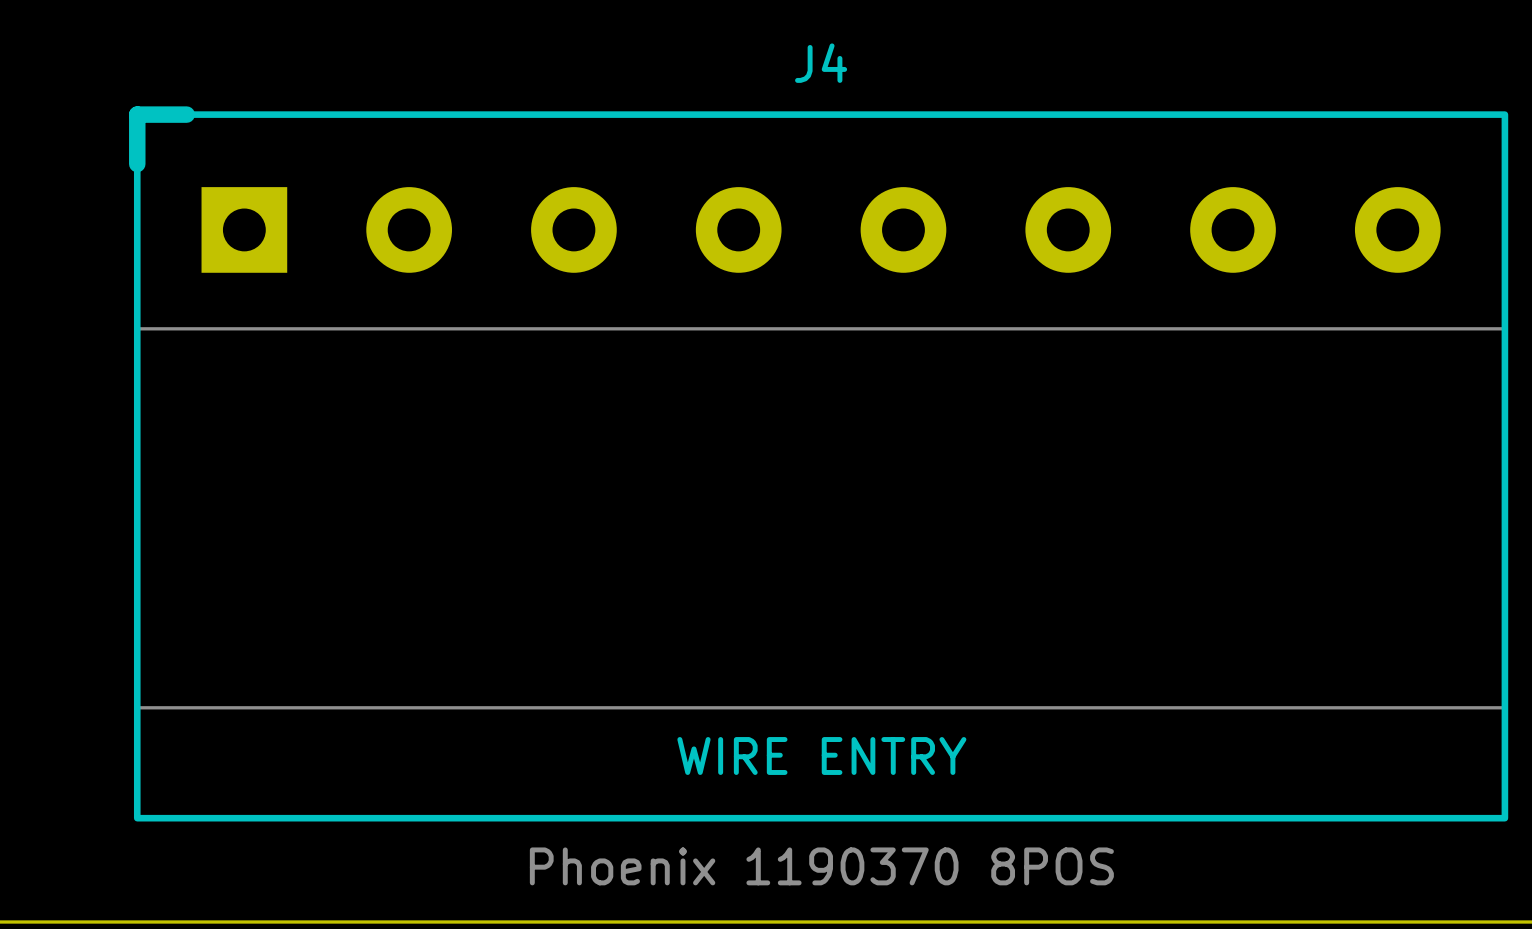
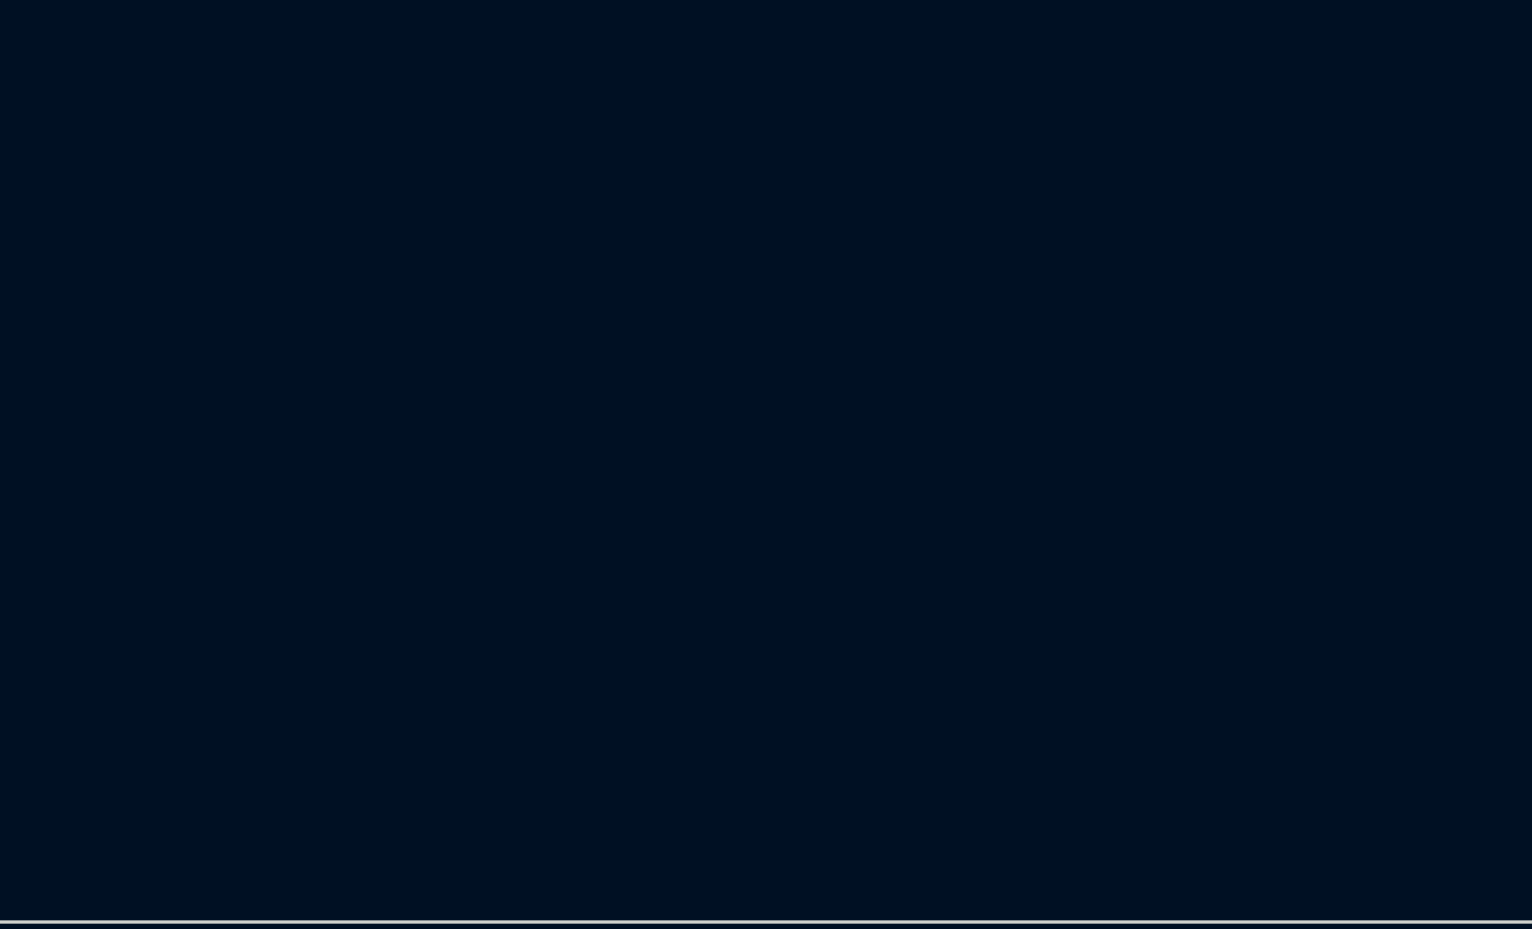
J4: Phoenix 1190370 8POS (818, 463) -> none

